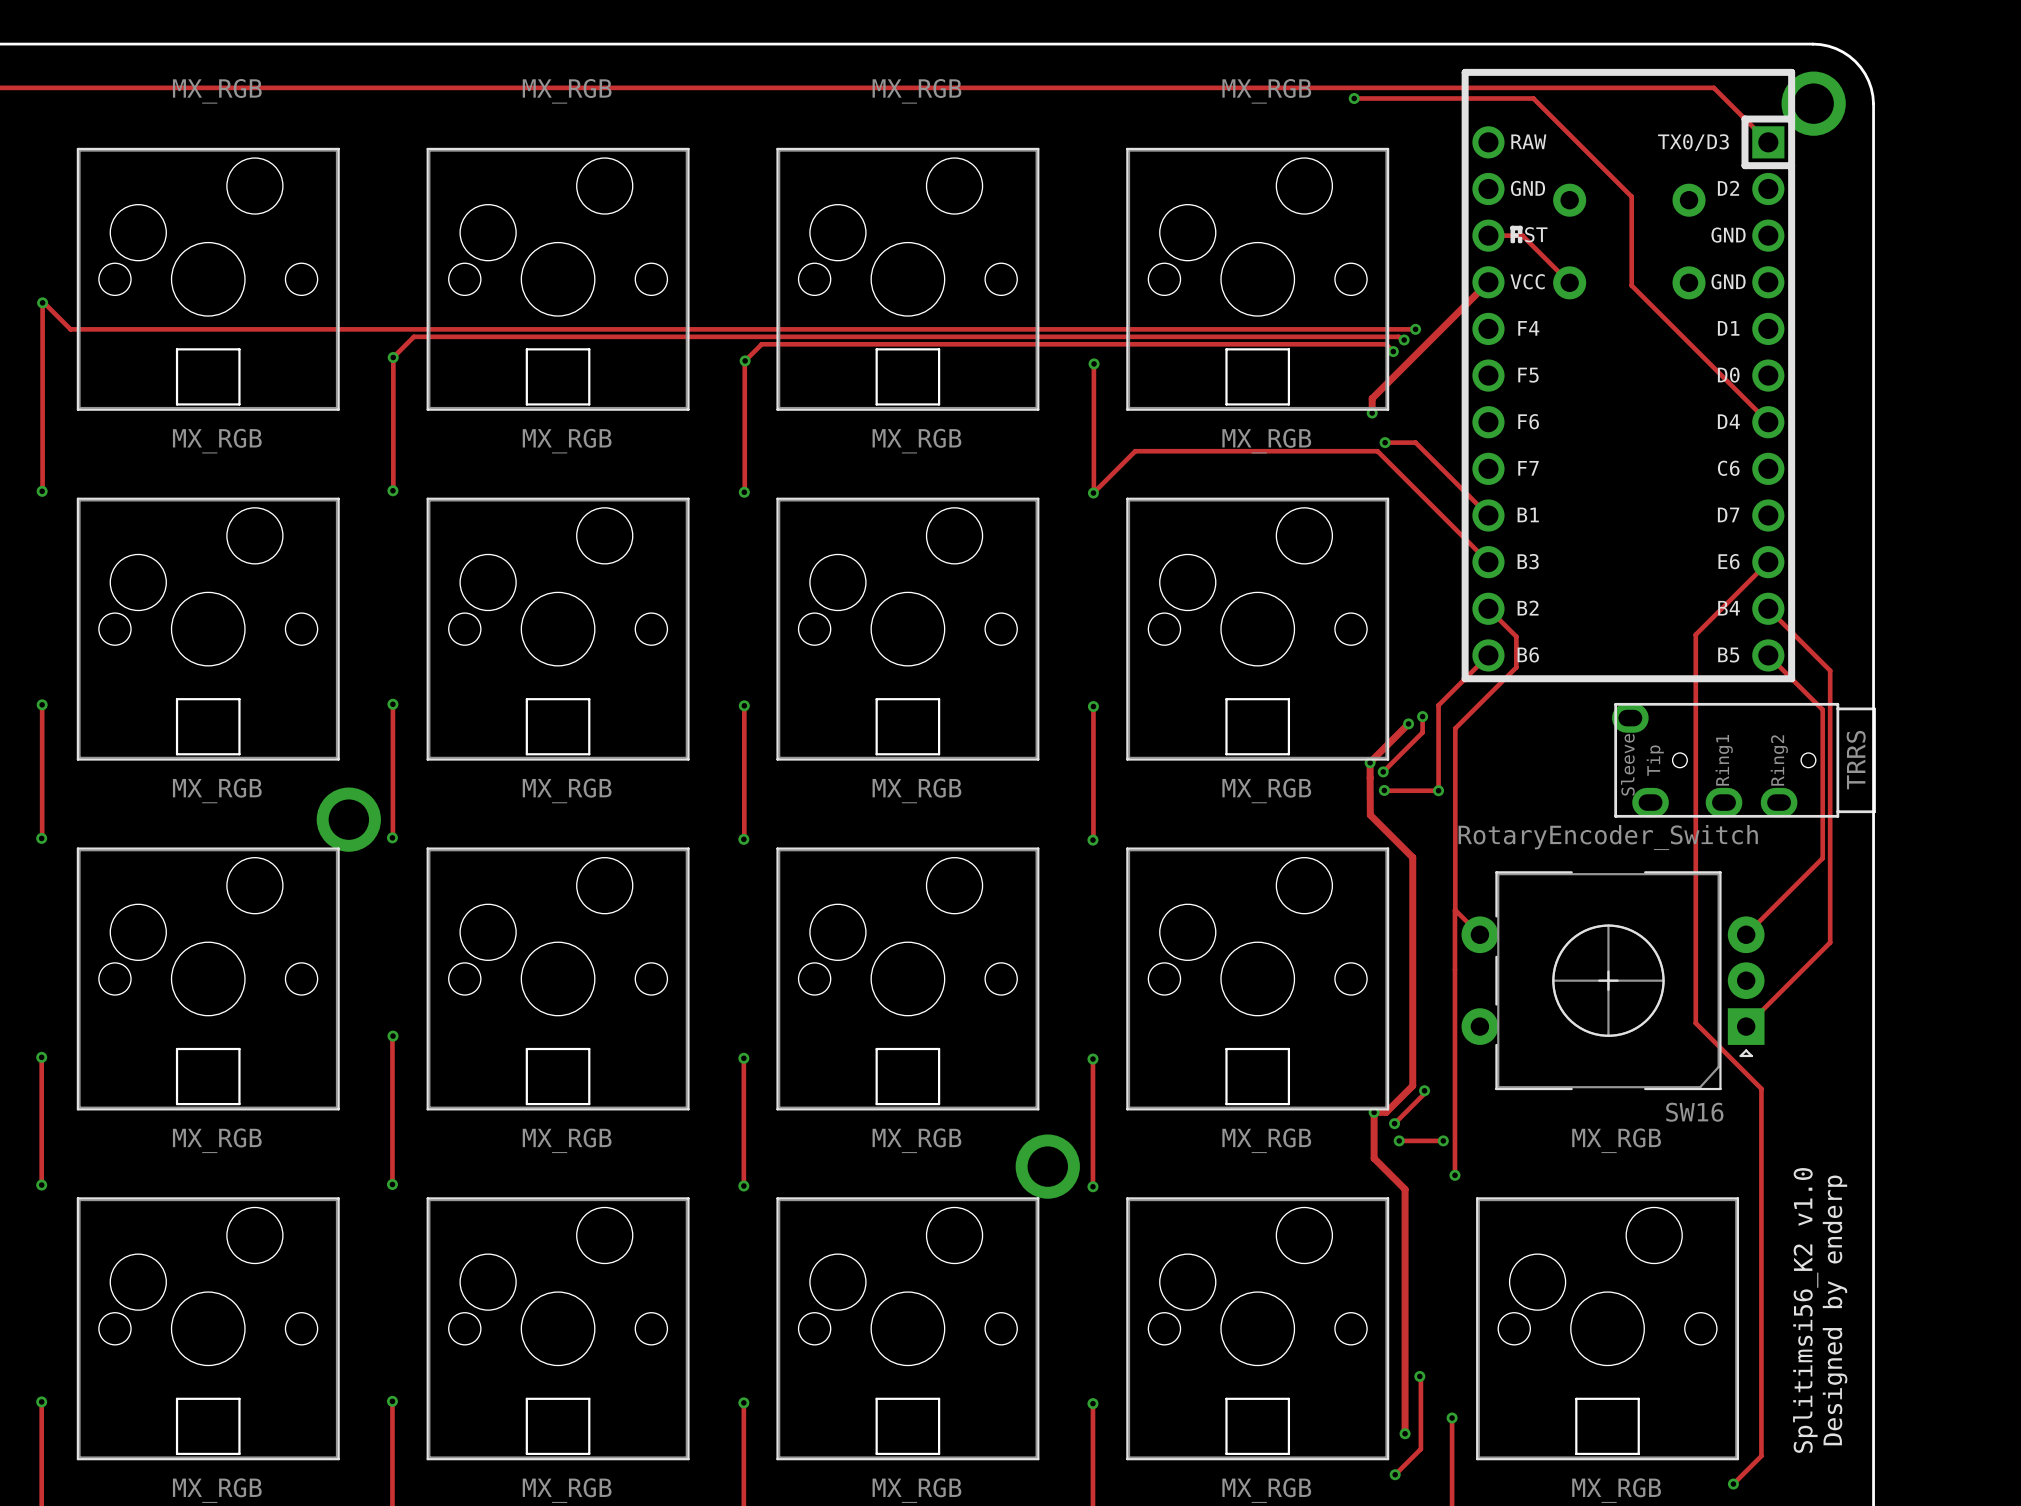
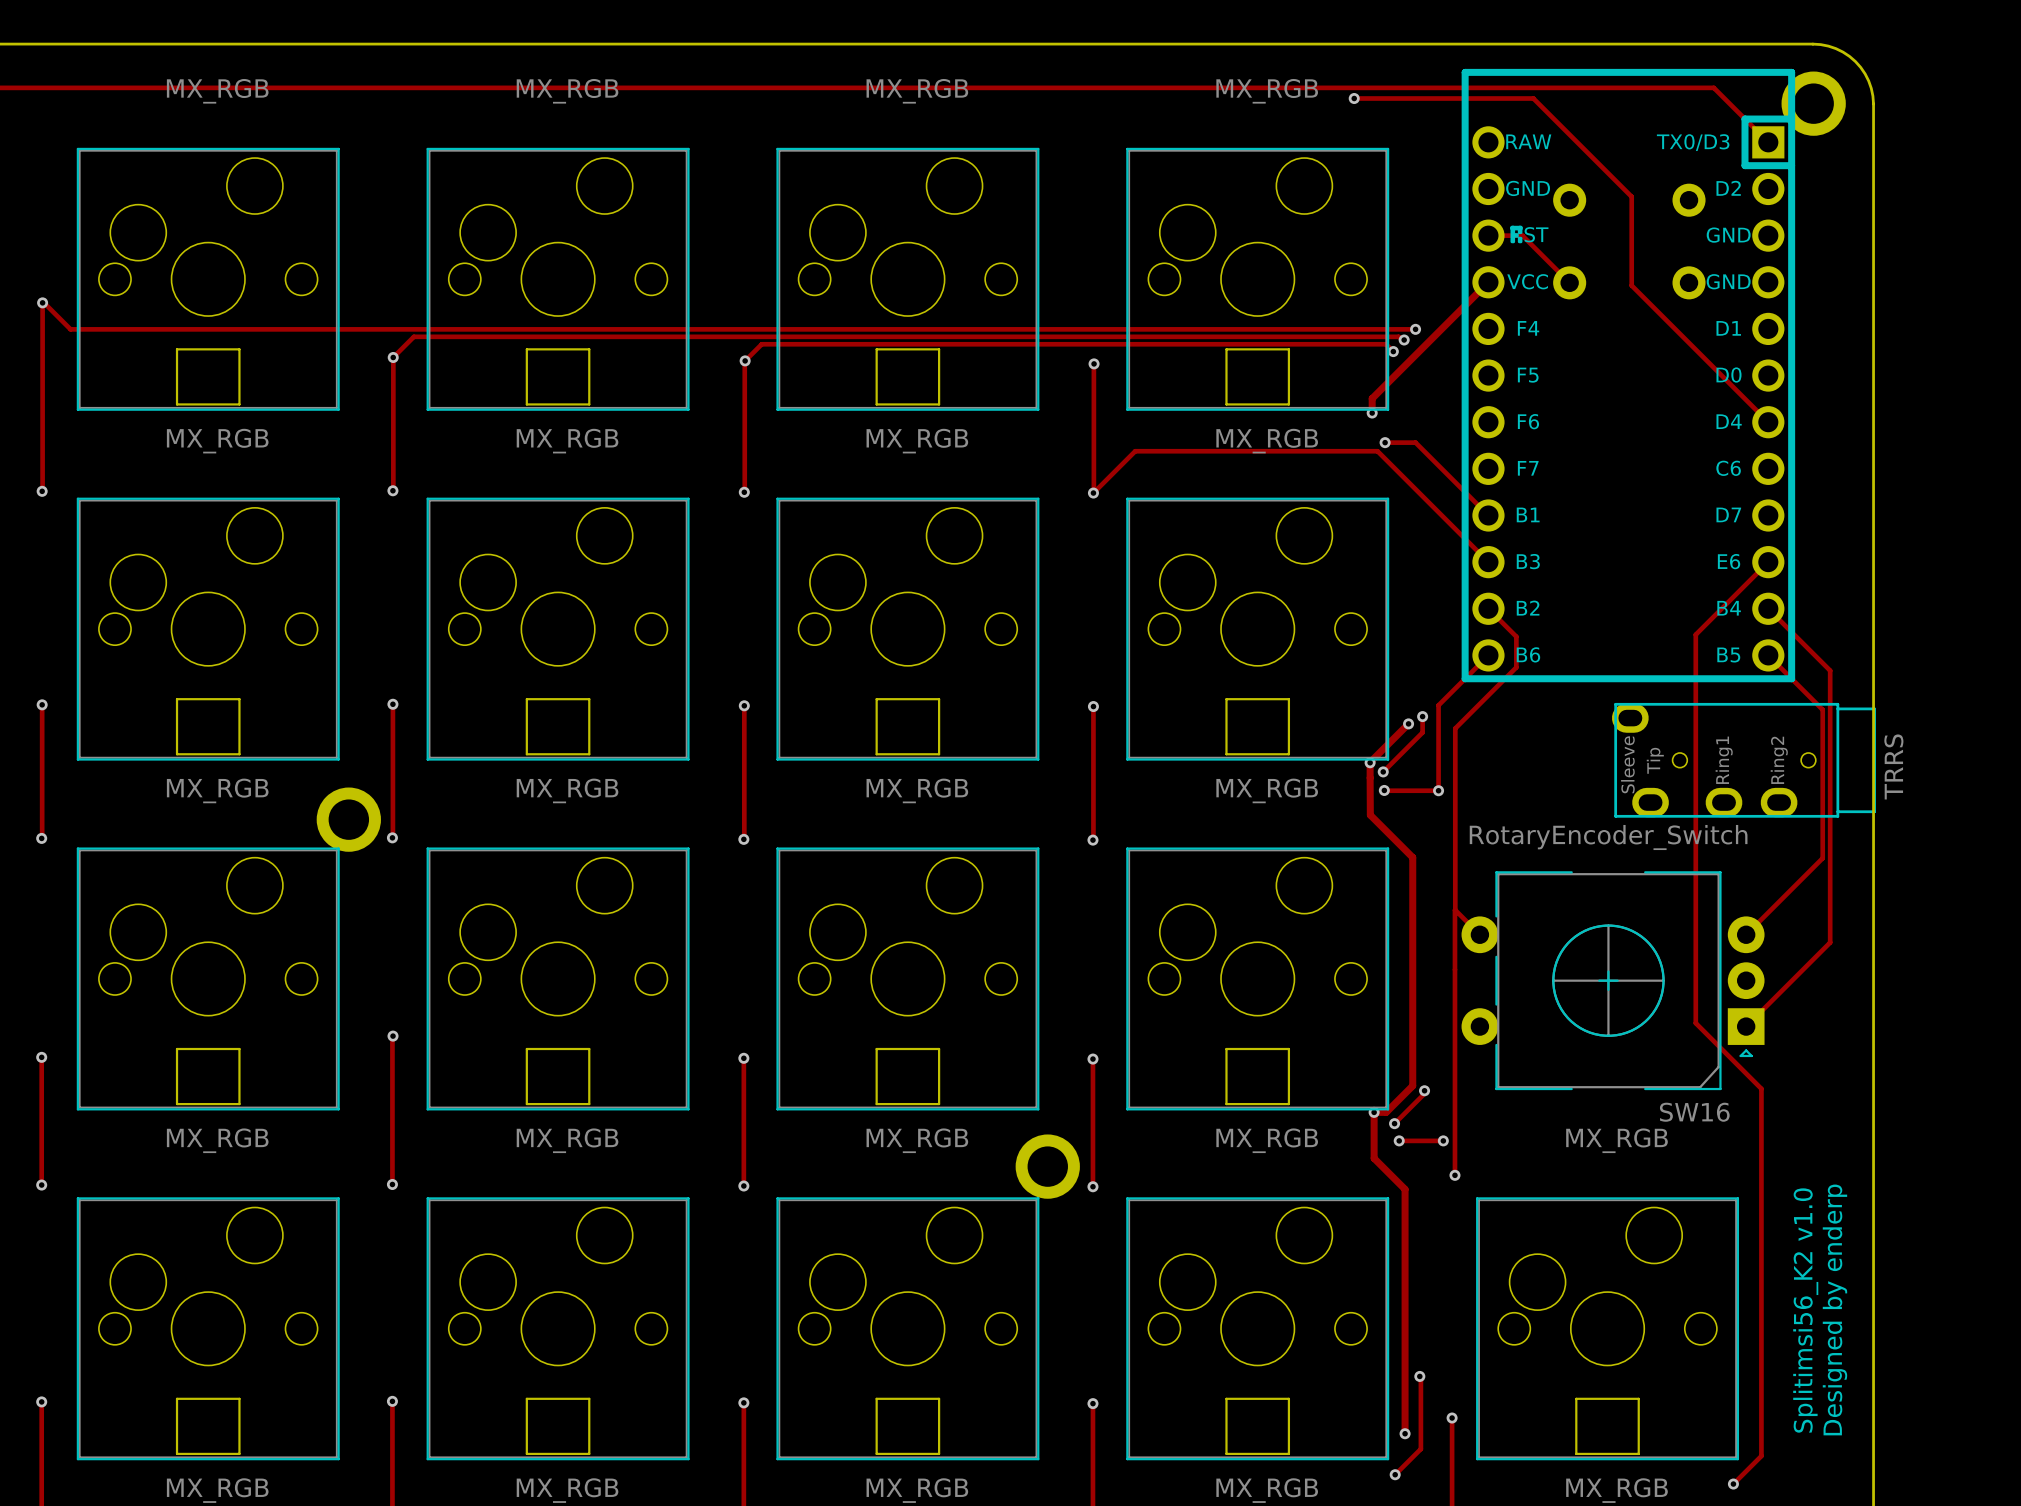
part value position: TRRS (1856, 760) -> TRRS (1893, 766)

